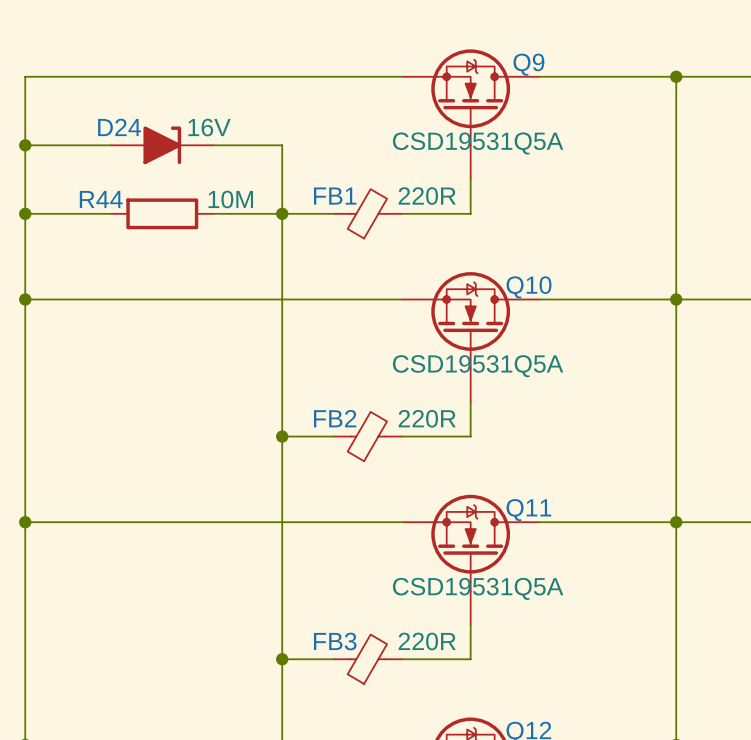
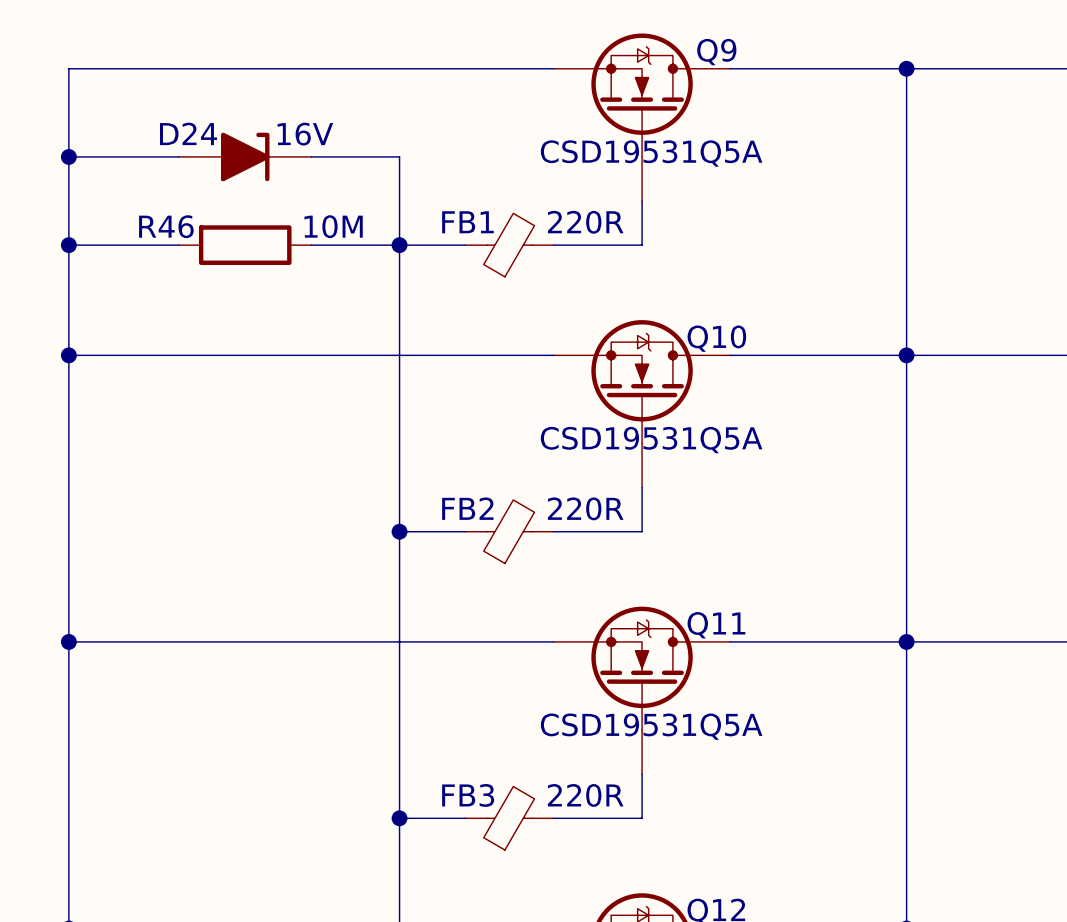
R44 name: R44 (101, 199) -> R46 (166, 226)

